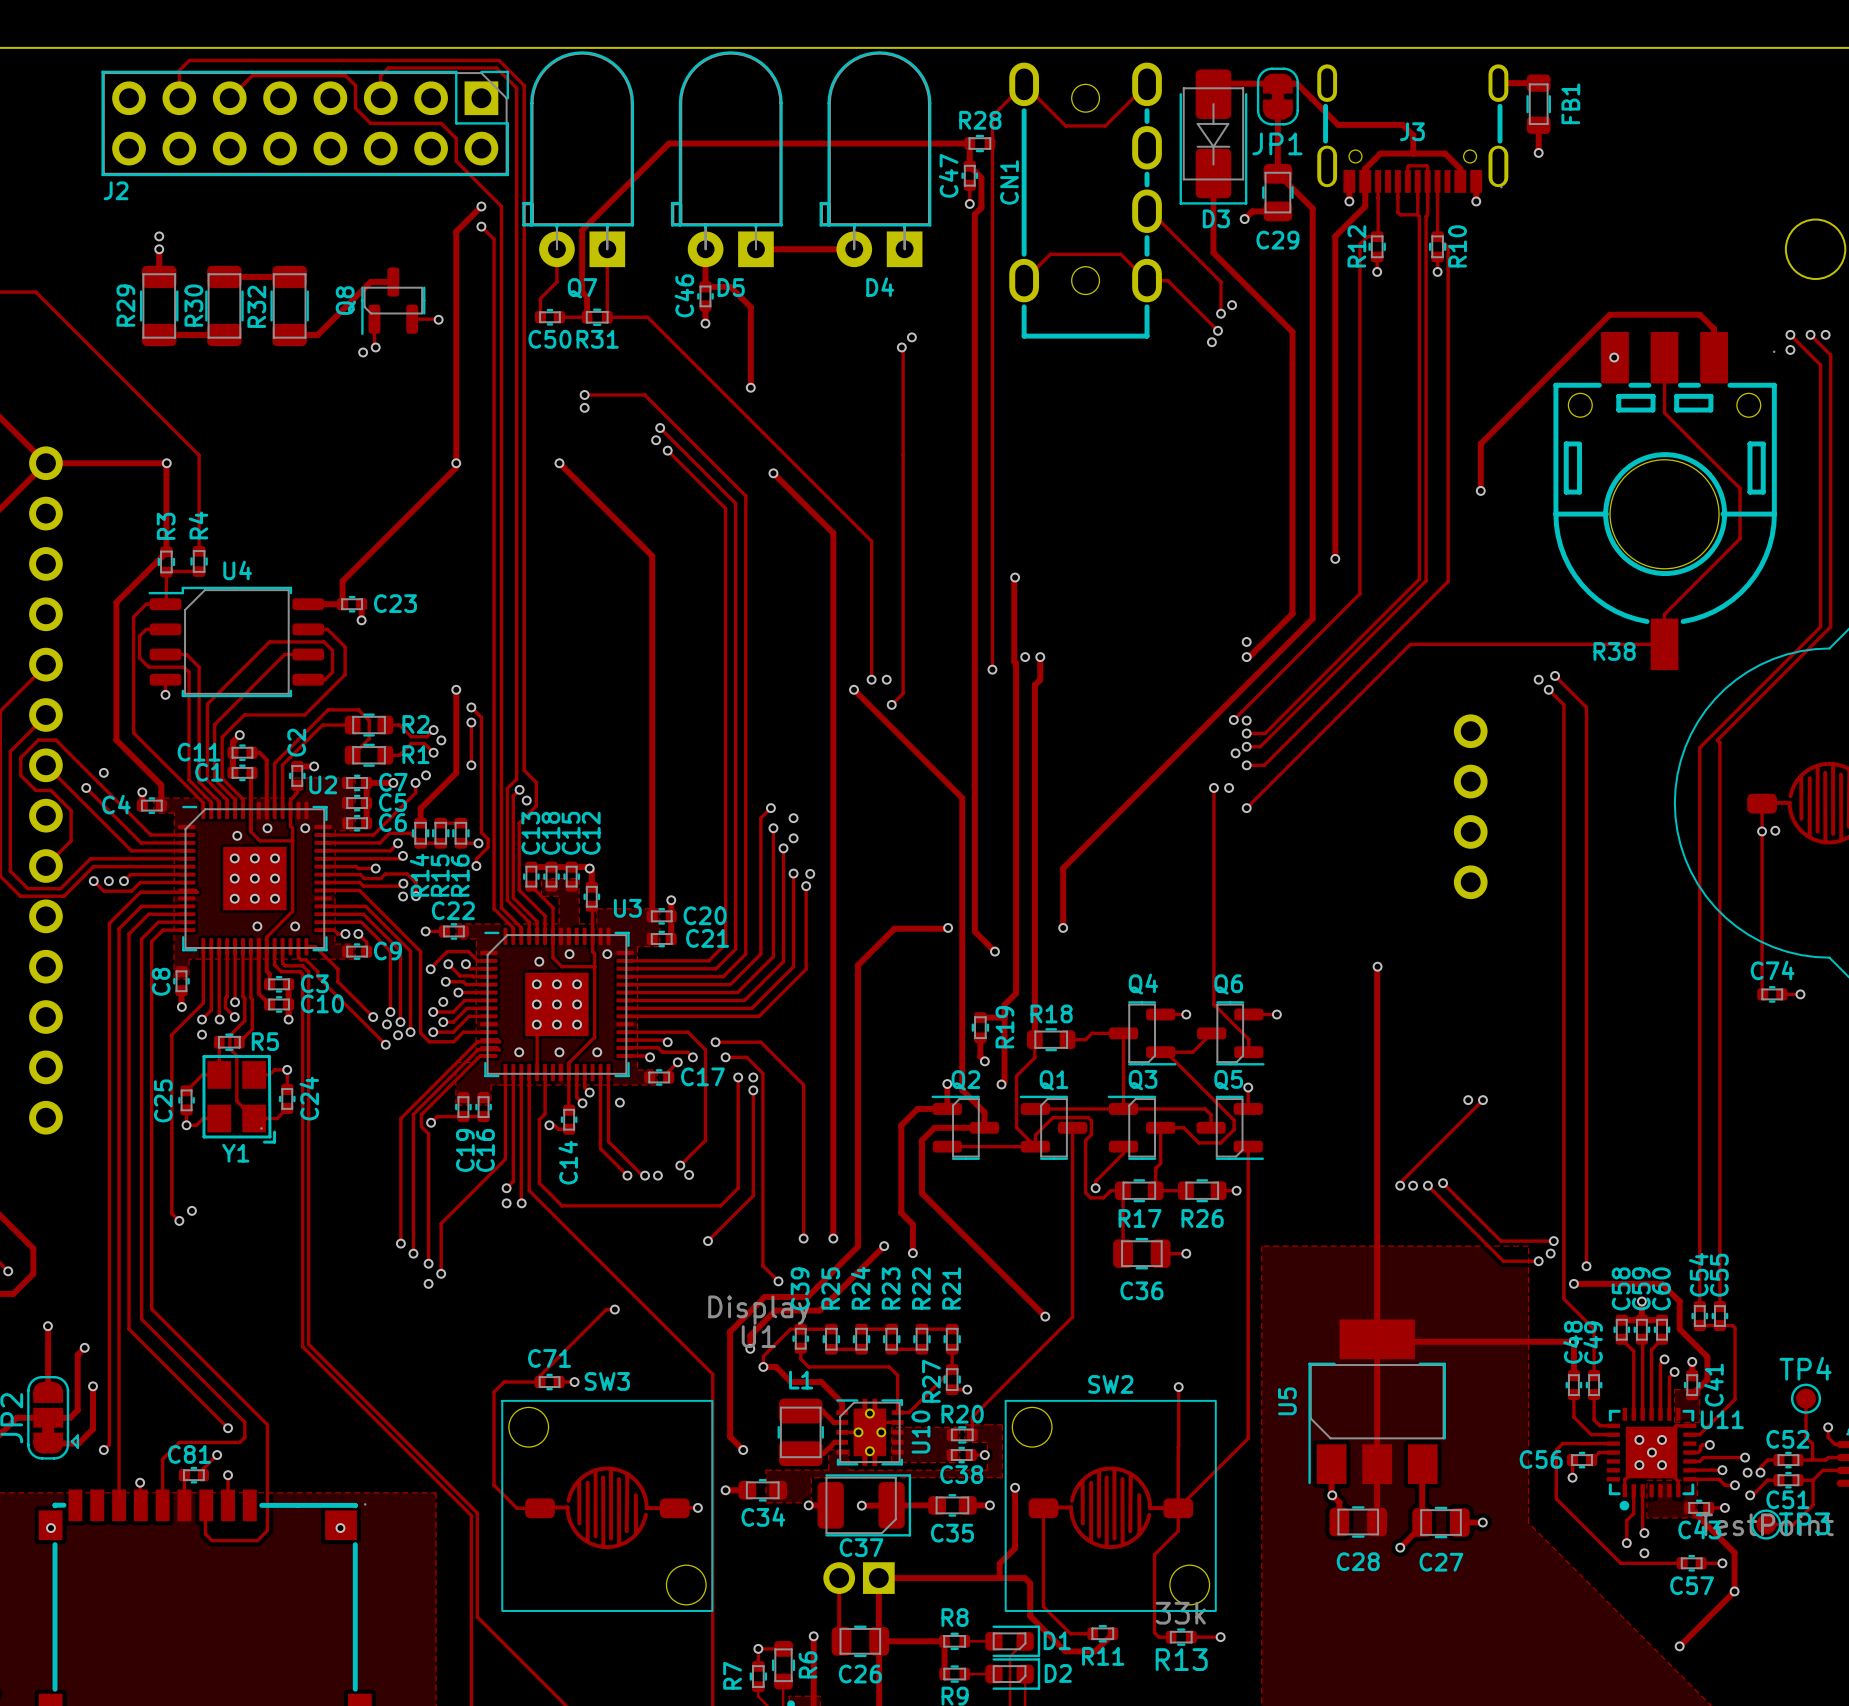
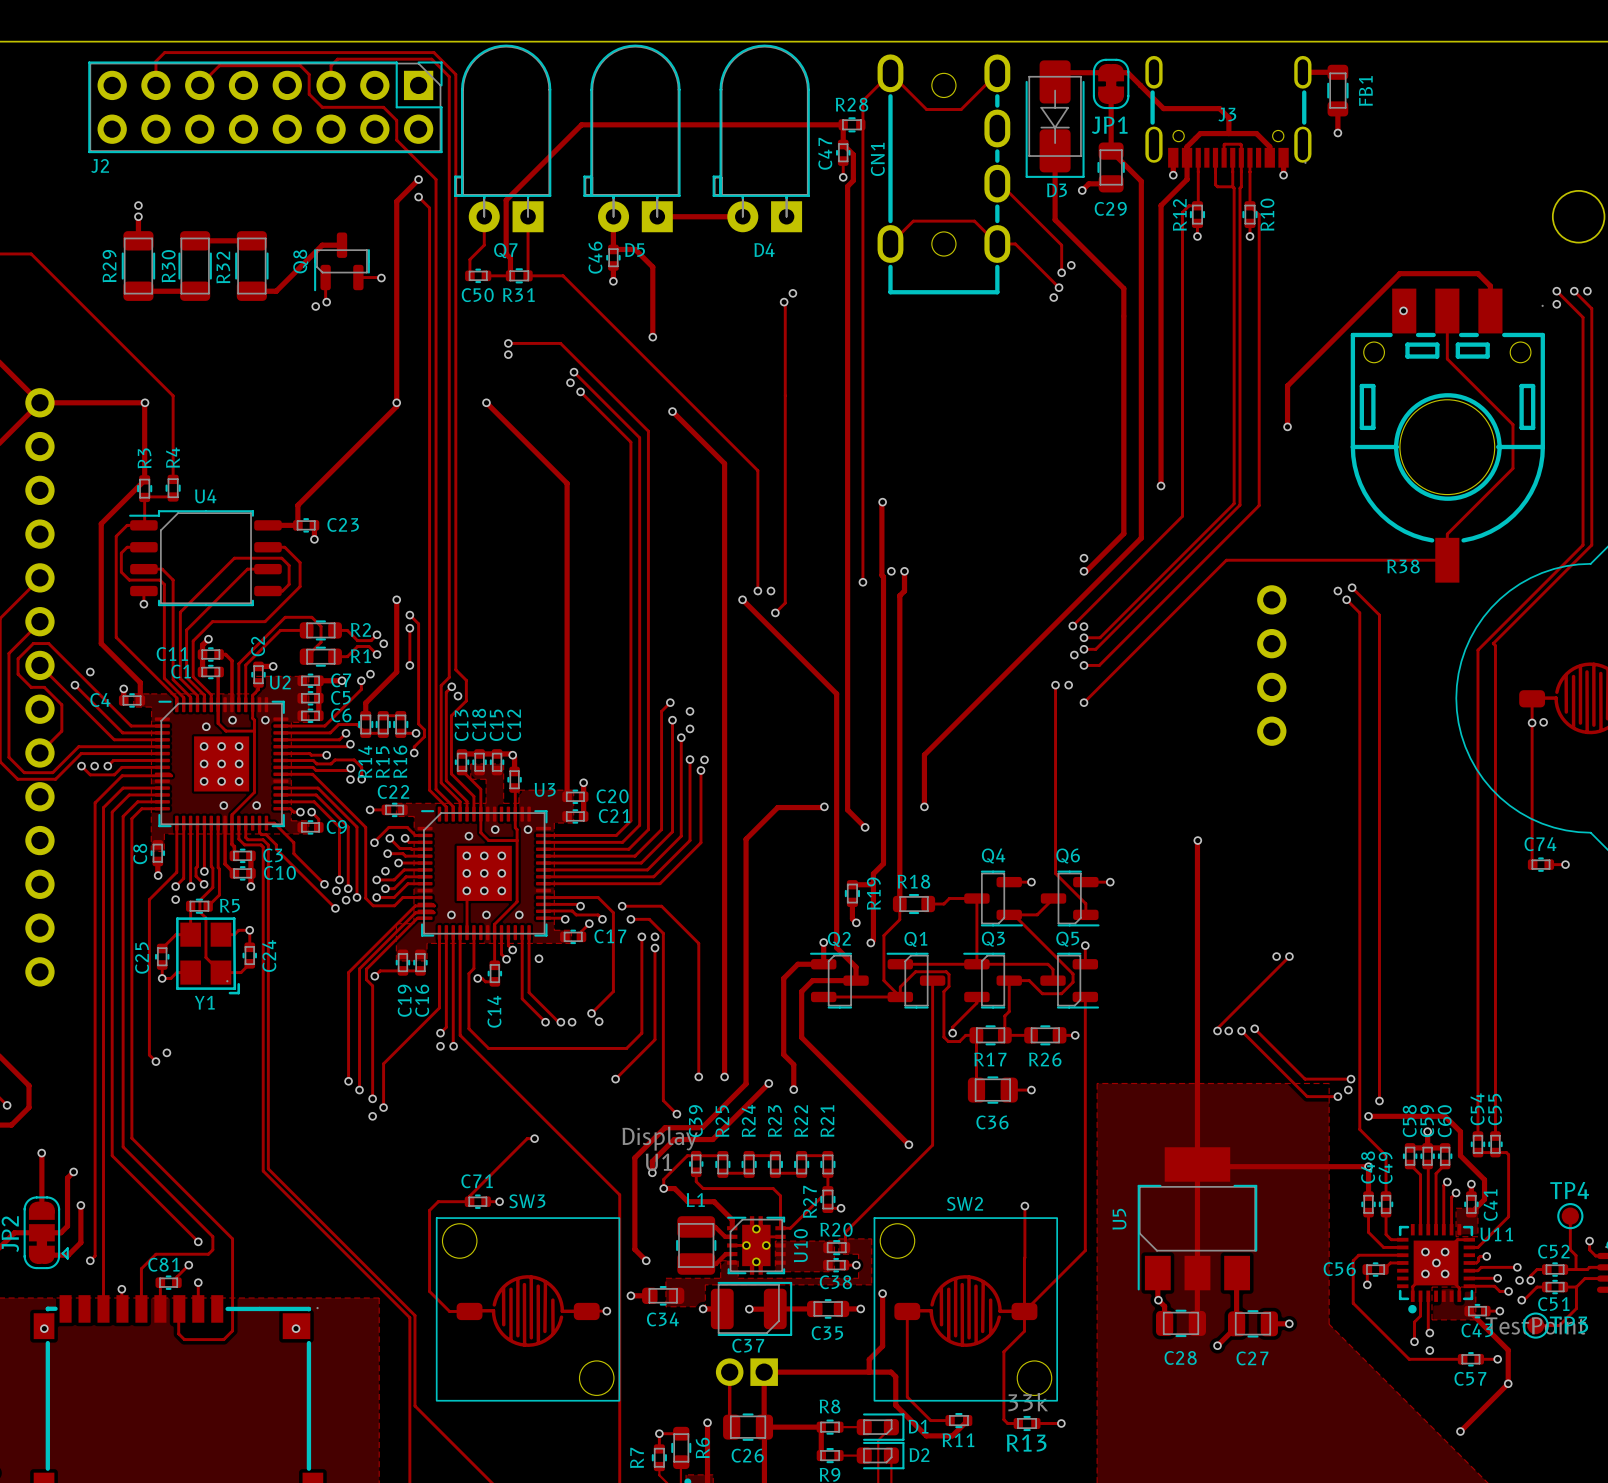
U1 footprint: [29, 446, 1488, 1135] -> [25, 388, 1287, 987]

